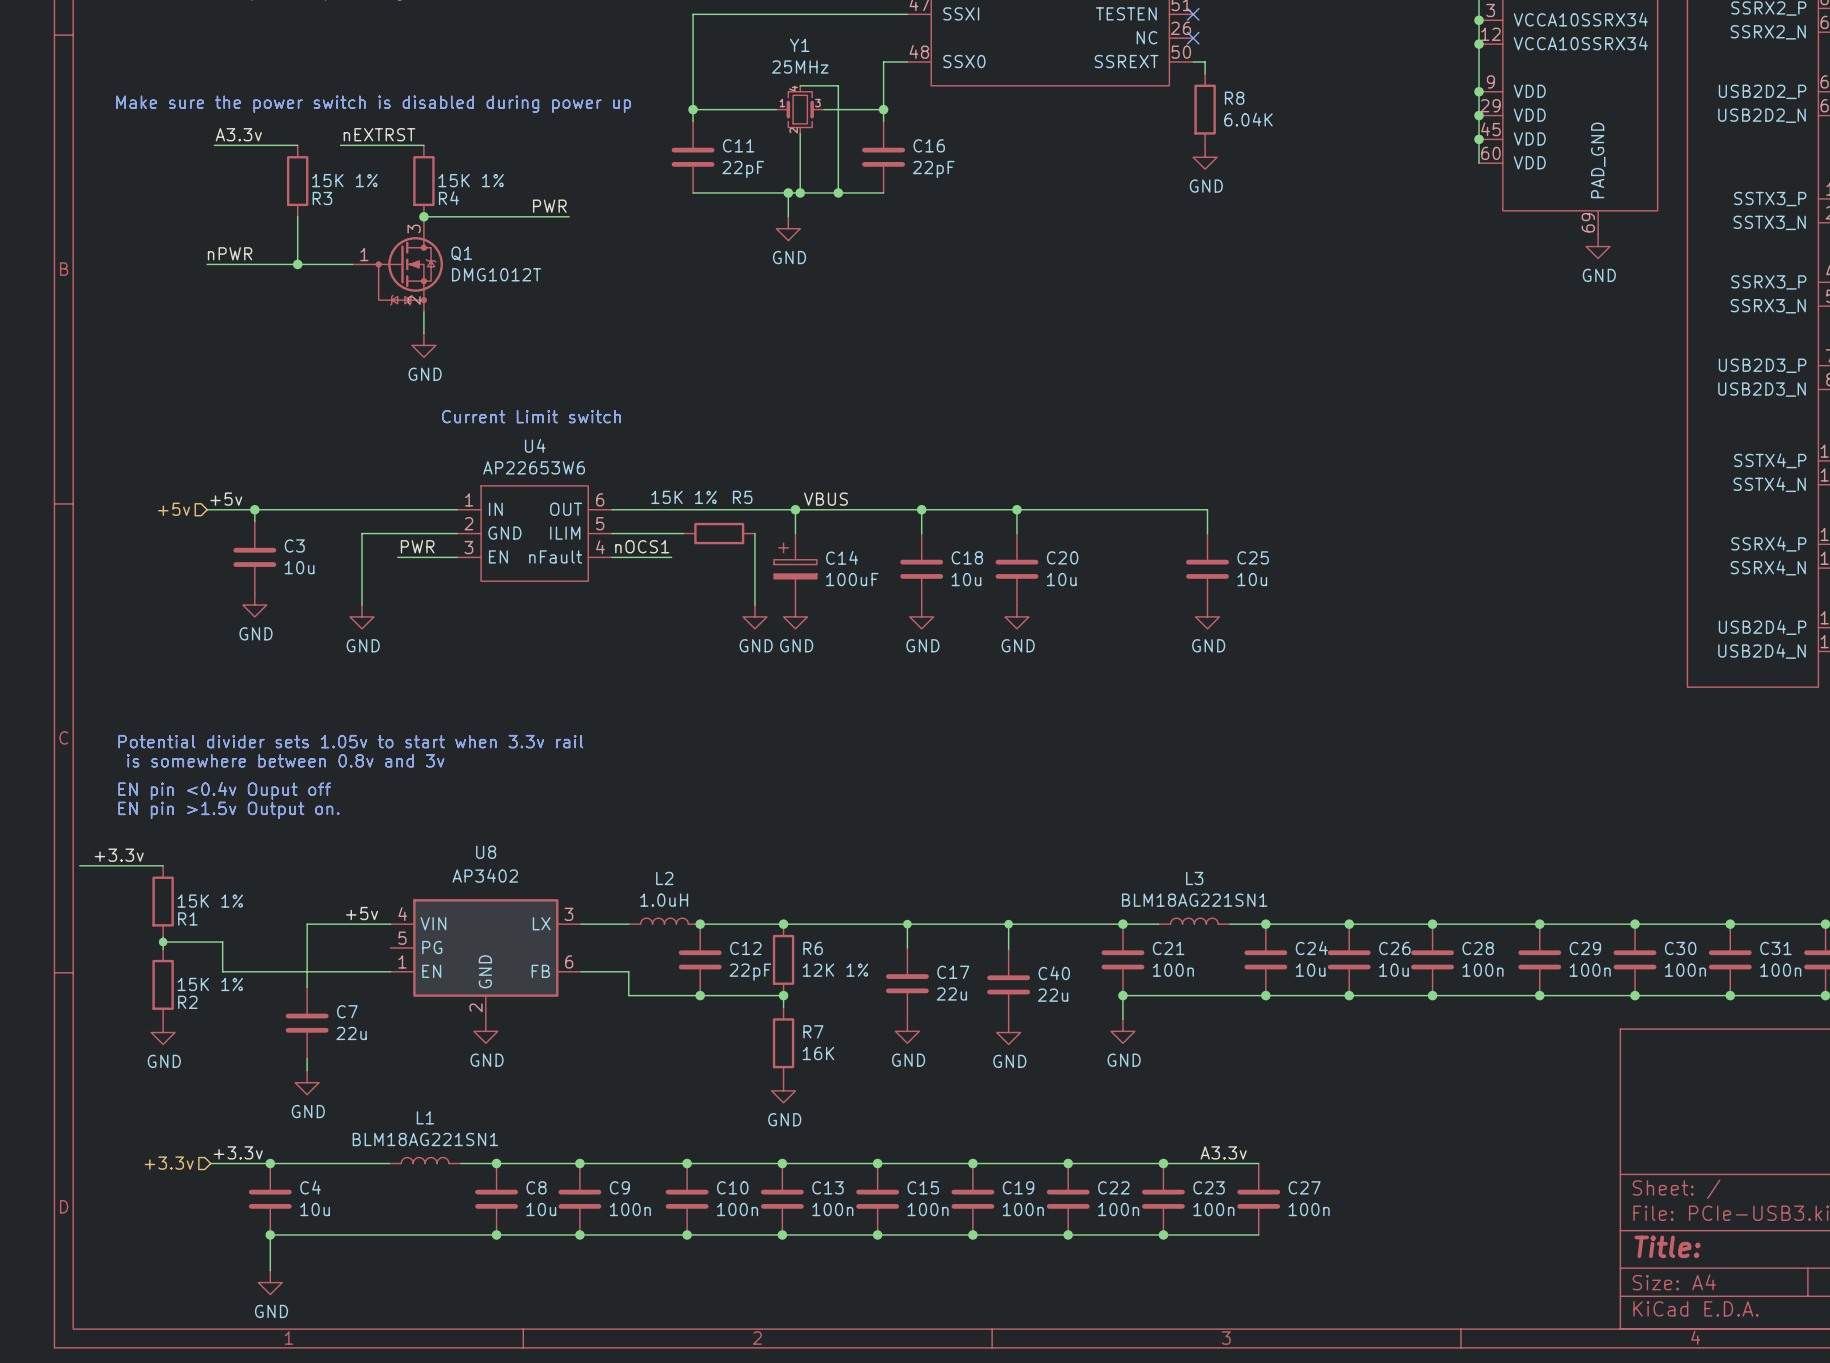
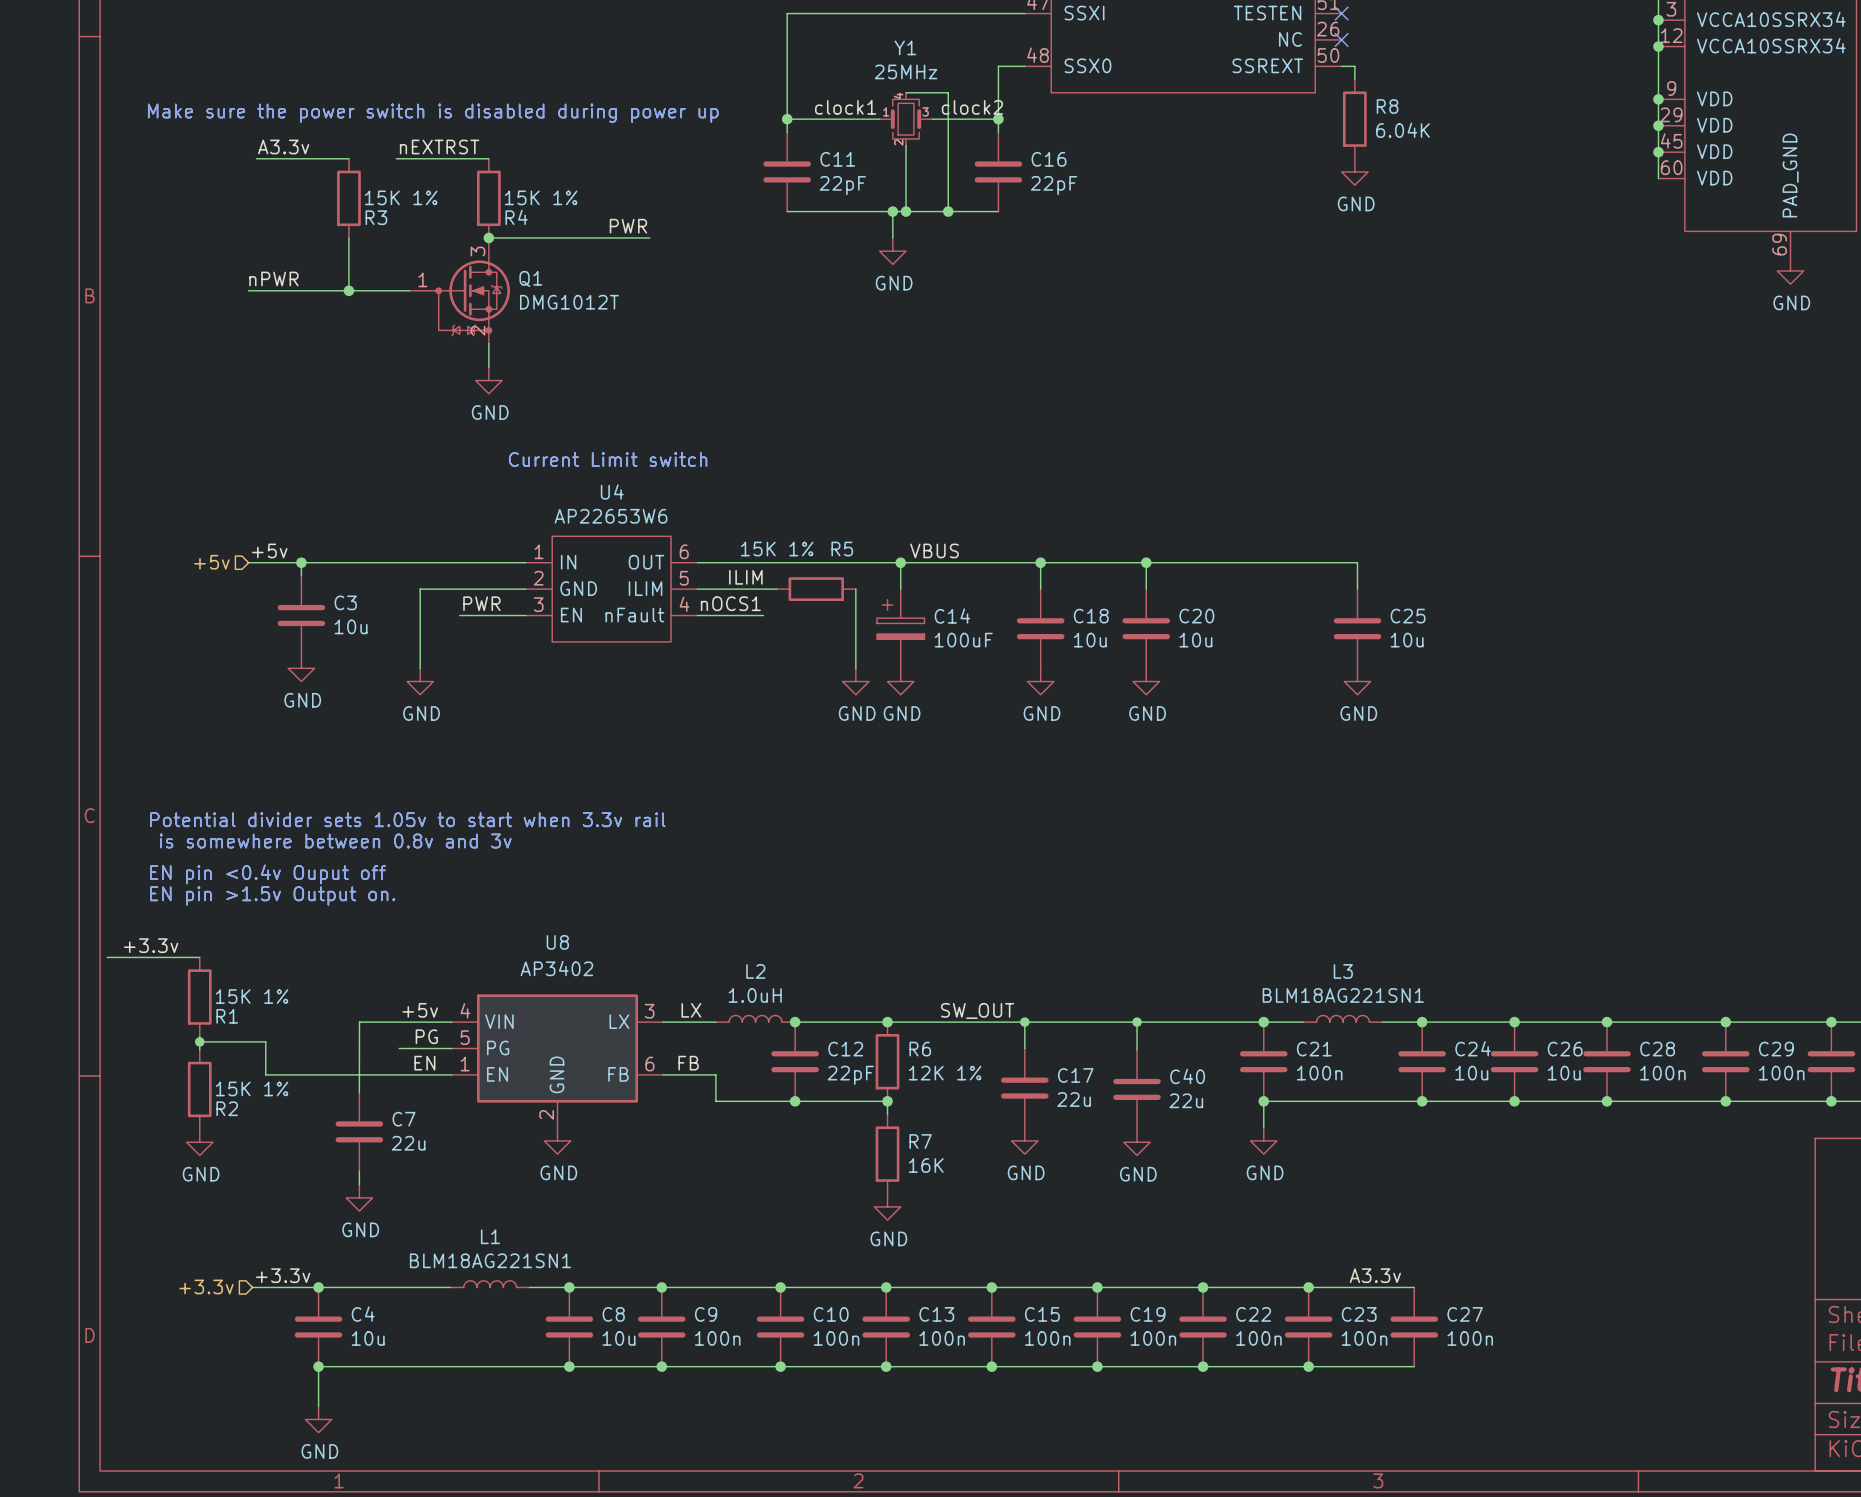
label: none -> clock1 (845, 107)
label: none -> clock2 (972, 107)
label: none -> ILIM (745, 577)
label: none -> LX (691, 1010)
label: none -> SW_OUT (977, 1010)
label: none -> PG (426, 1036)
wire: none -> (399, 1048) (451, 1048)
label: none -> EN (424, 1063)
label: none -> FB (688, 1063)

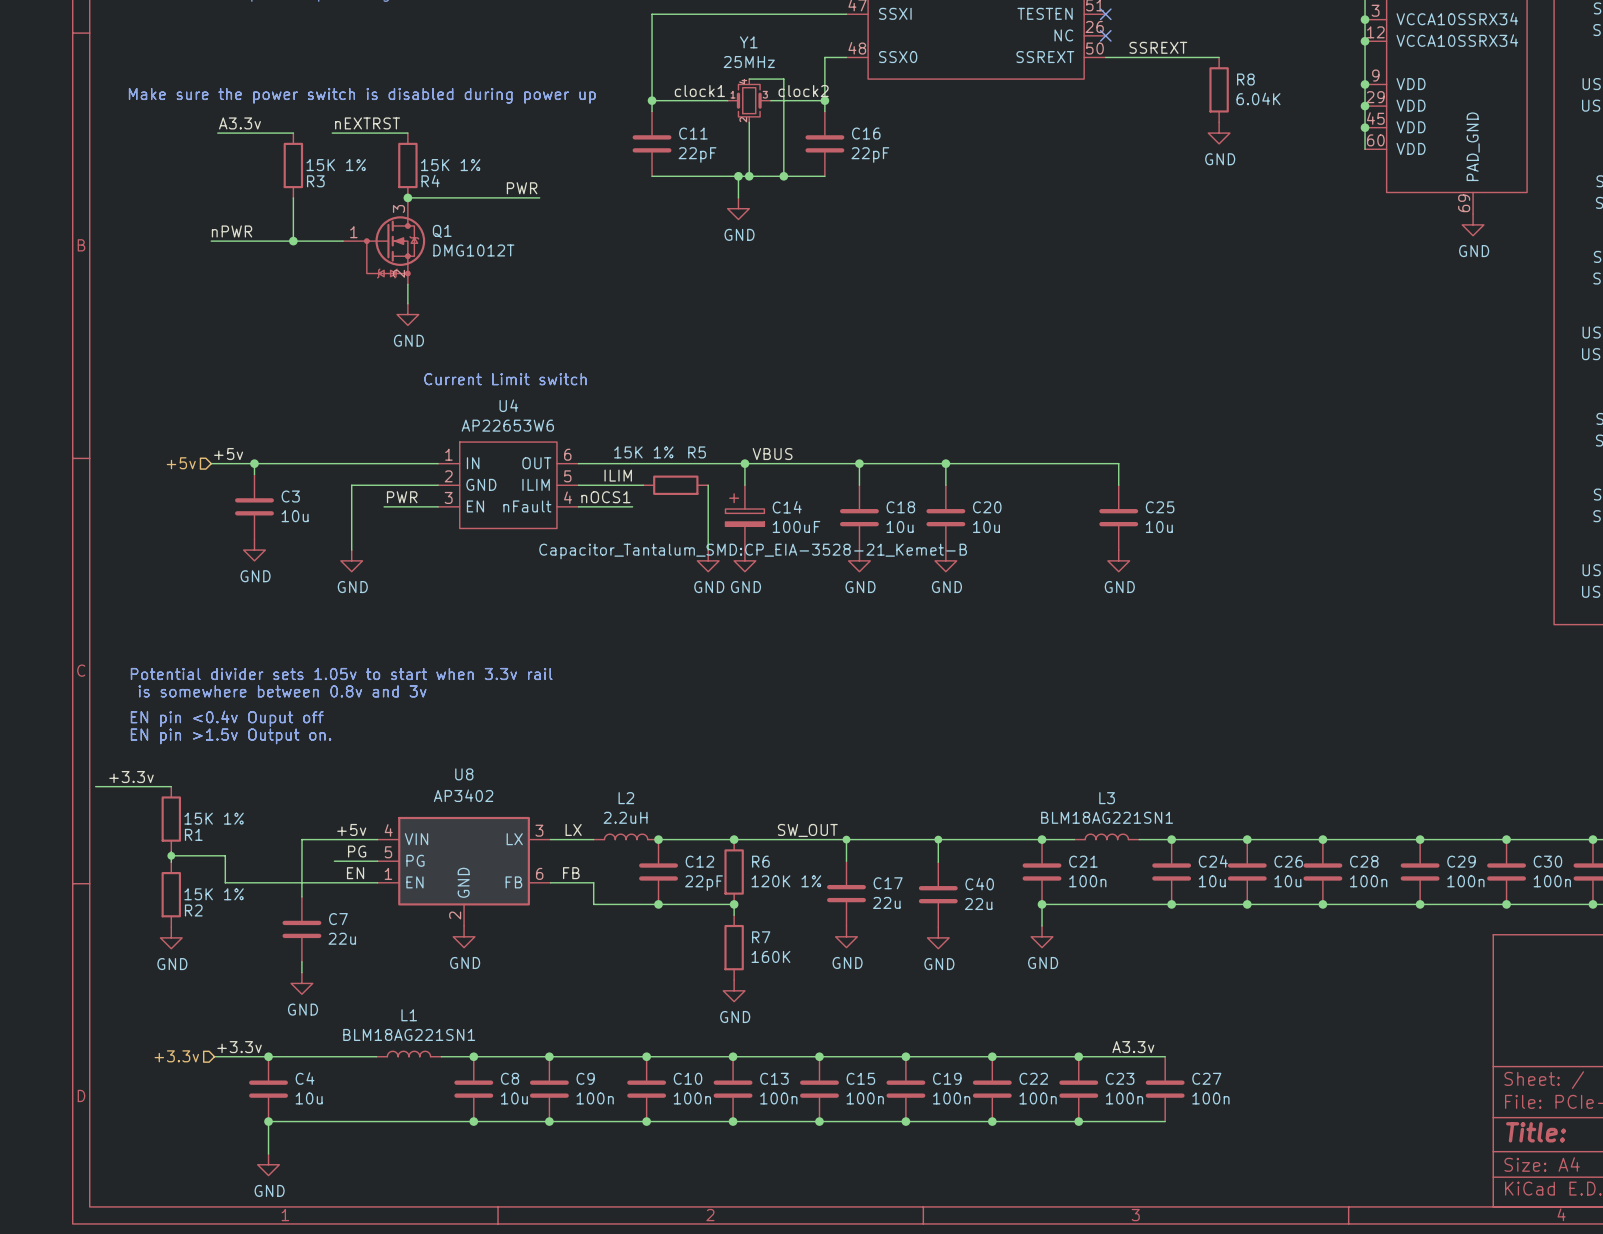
label: none -> SSREXT (1158, 47)
wire: (1354, 66) (1354, 79) -> (1116, 57) (1219, 57)
R8 position: (1354, 119) -> (1219, 89)
power symbol position: GND (1354, 171) -> GND (1219, 133)
C14 text: none -> Capacitor_Tantalum_SMD:CP_EIA-3528-21_Kemet-B (753, 551)
L2 value: 1.0uH (755, 995) -> 2.2uH (625, 817)
R6 value: 12K 1% (945, 1073) -> 120K 1% (786, 881)
R7 value: 16K (926, 1165) -> 160K (770, 956)

